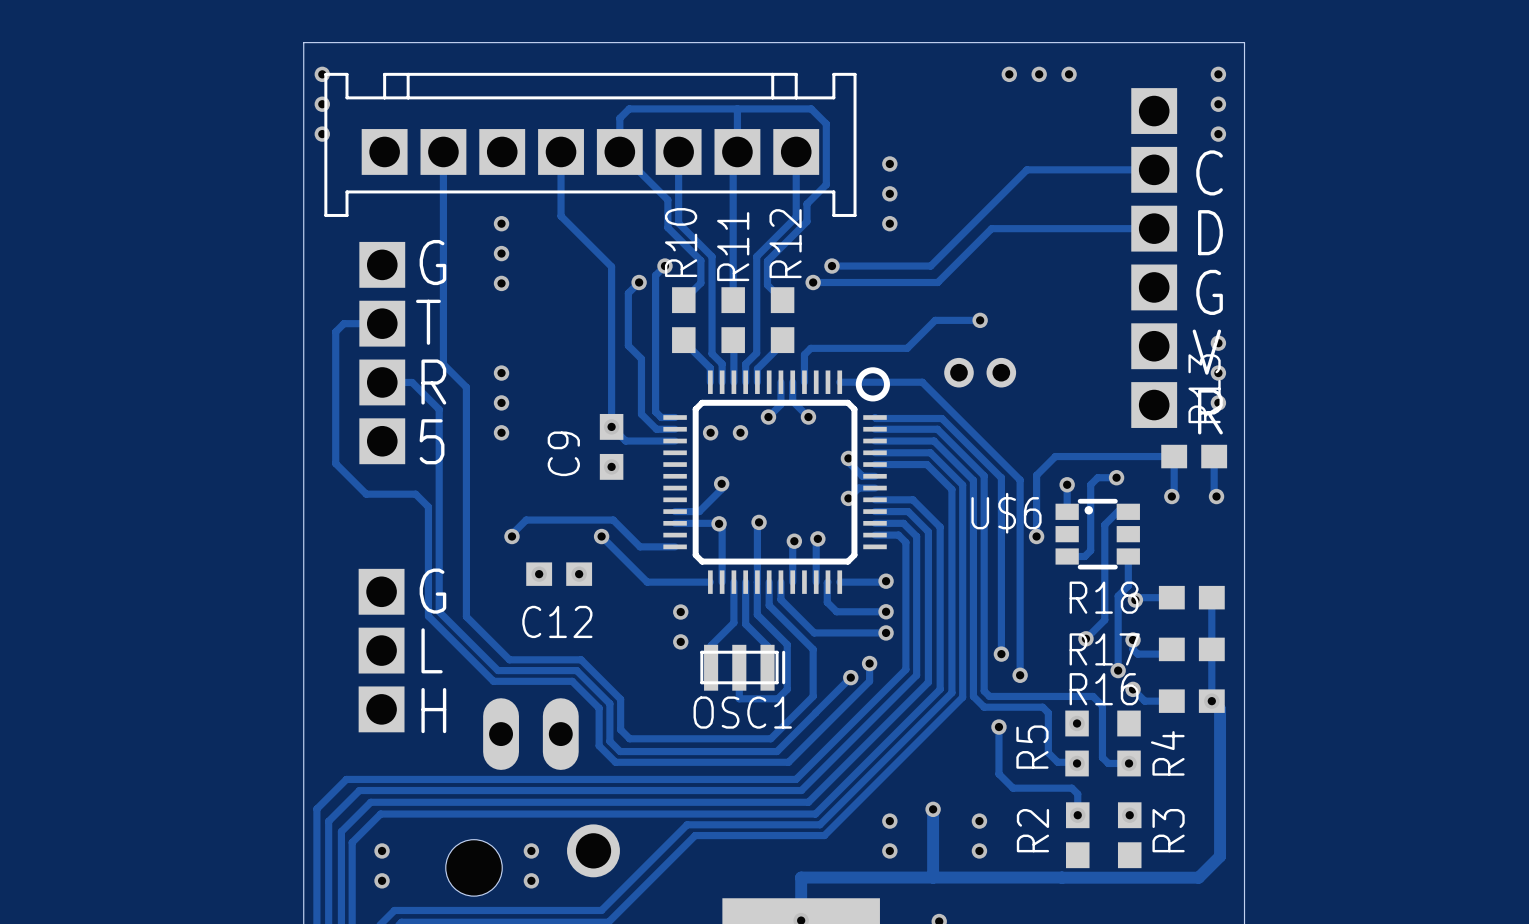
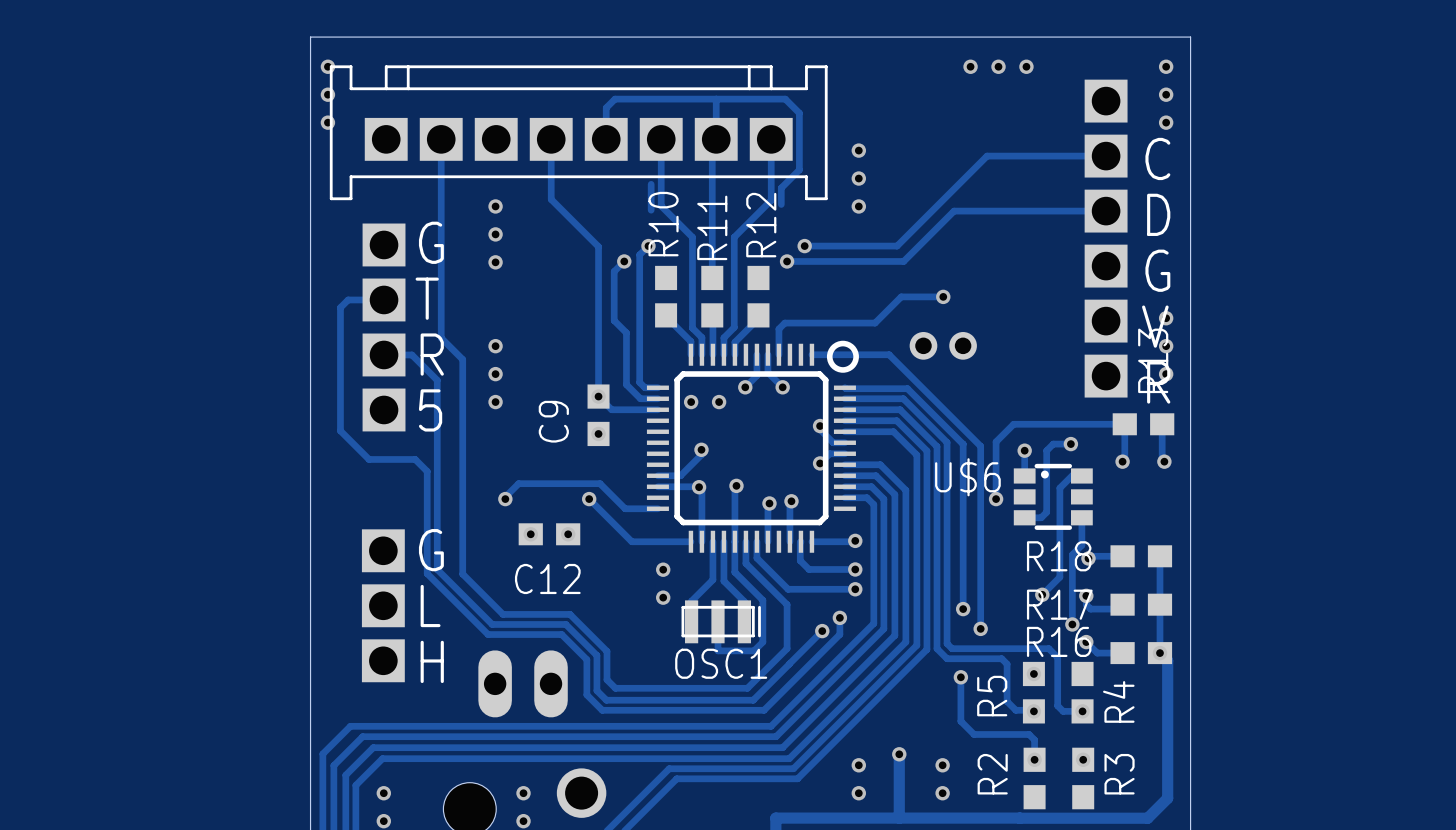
track: (619, 151) (667, 200) -> none
track: (806, 221) (767, 261) (767, 285) (782, 300) -> none
track: (667, 227) (700, 260) (700, 283) (683, 300) -> none

